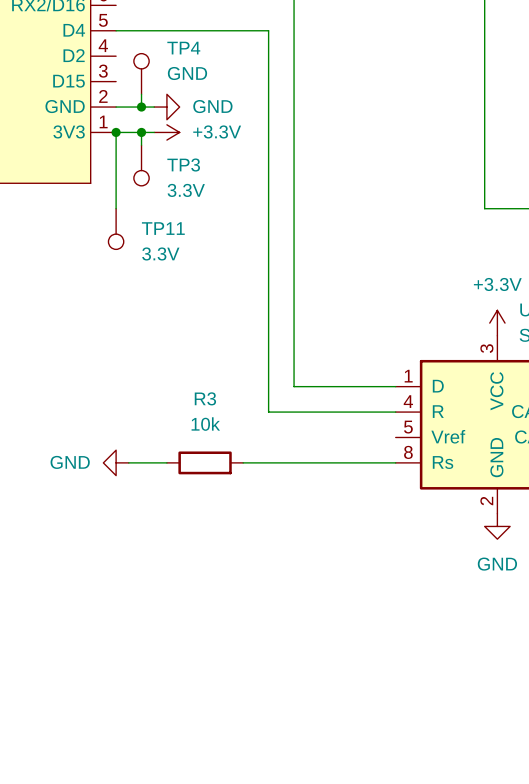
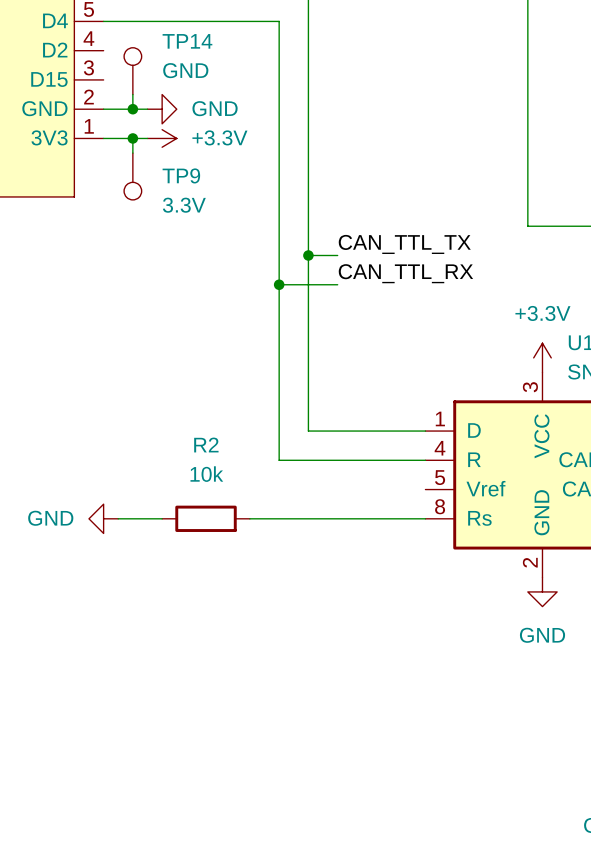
TP4 name: TP4 (183, 48) -> TP14 (187, 41)
wire: (116, 132) (116, 208) -> none
junction: (116, 132) -> none
TP3 name: TP3 (183, 165) -> TP9 (181, 175)
label: none -> CAN_TTL_TX (404, 244)
TP11: 3.3V (116, 229) -> none
wire: none -> (308, 255) (337, 255)
junction: none -> (308, 255)
label: none -> CAN_TTL_RX (405, 273)
wire: none -> (279, 284) (337, 284)
junction: none -> (279, 284)
R3 name: R3 (205, 398) -> R2 (206, 445)

